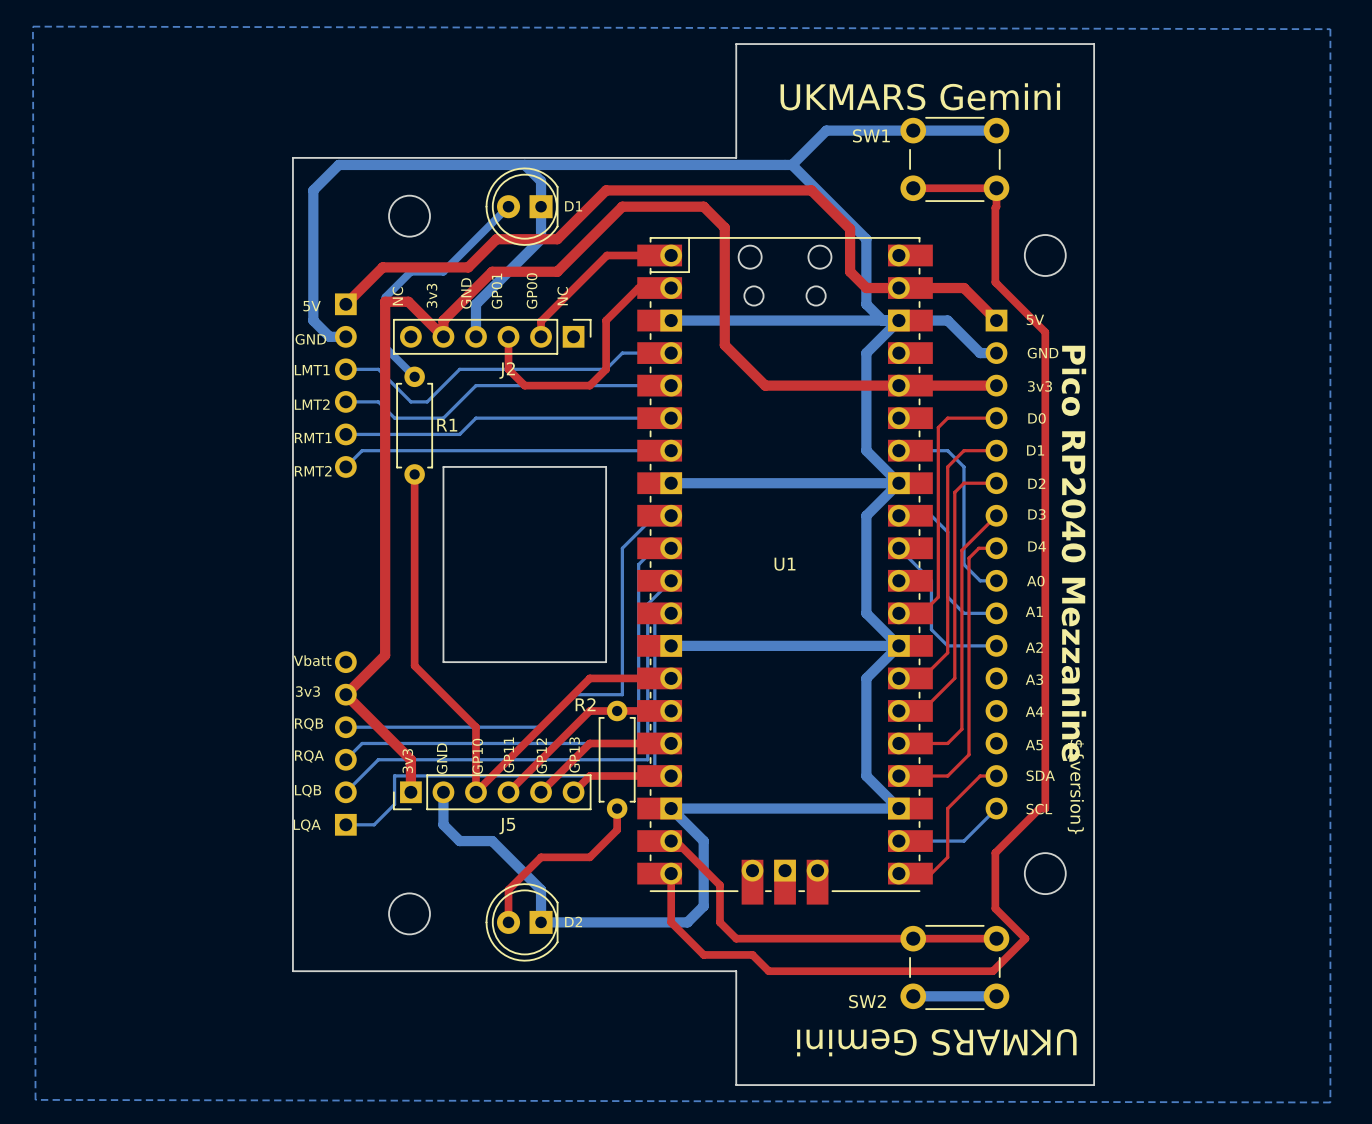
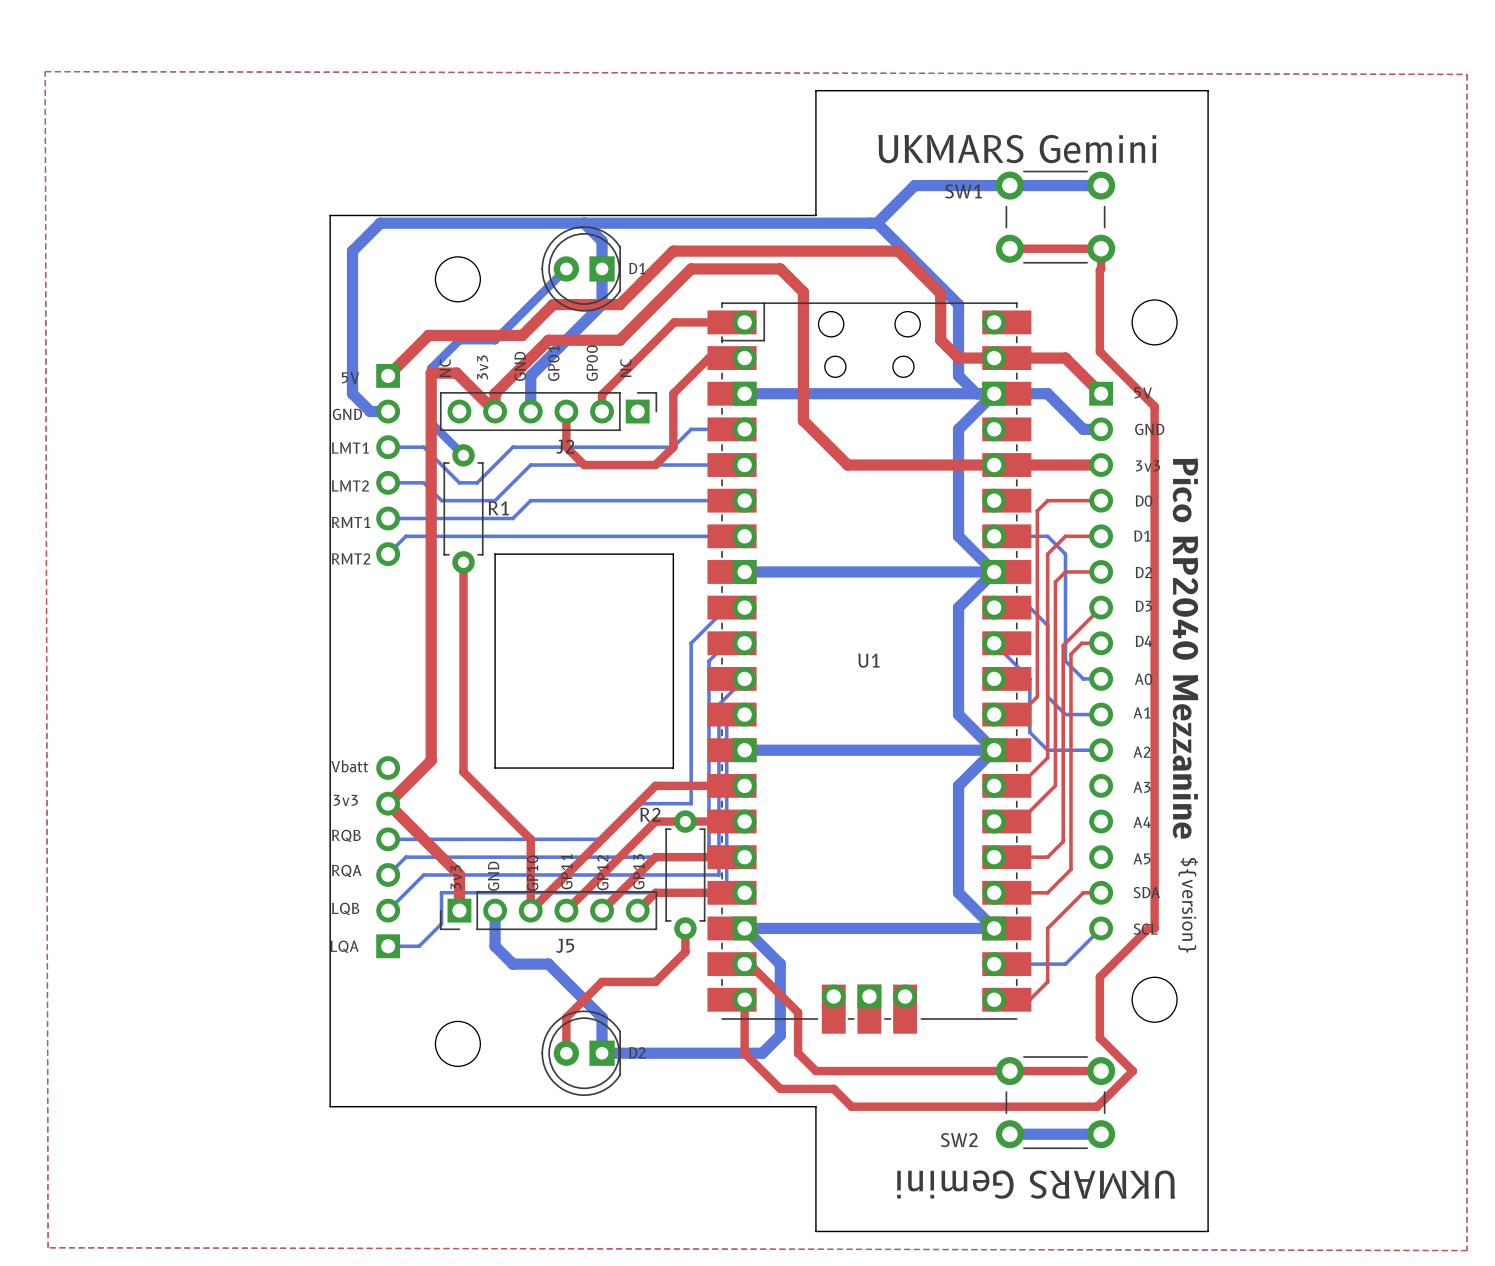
top zone outline: none -> (45, 71) (48, 1247) (1467, 1250) (1467, 74) (45, 71)

